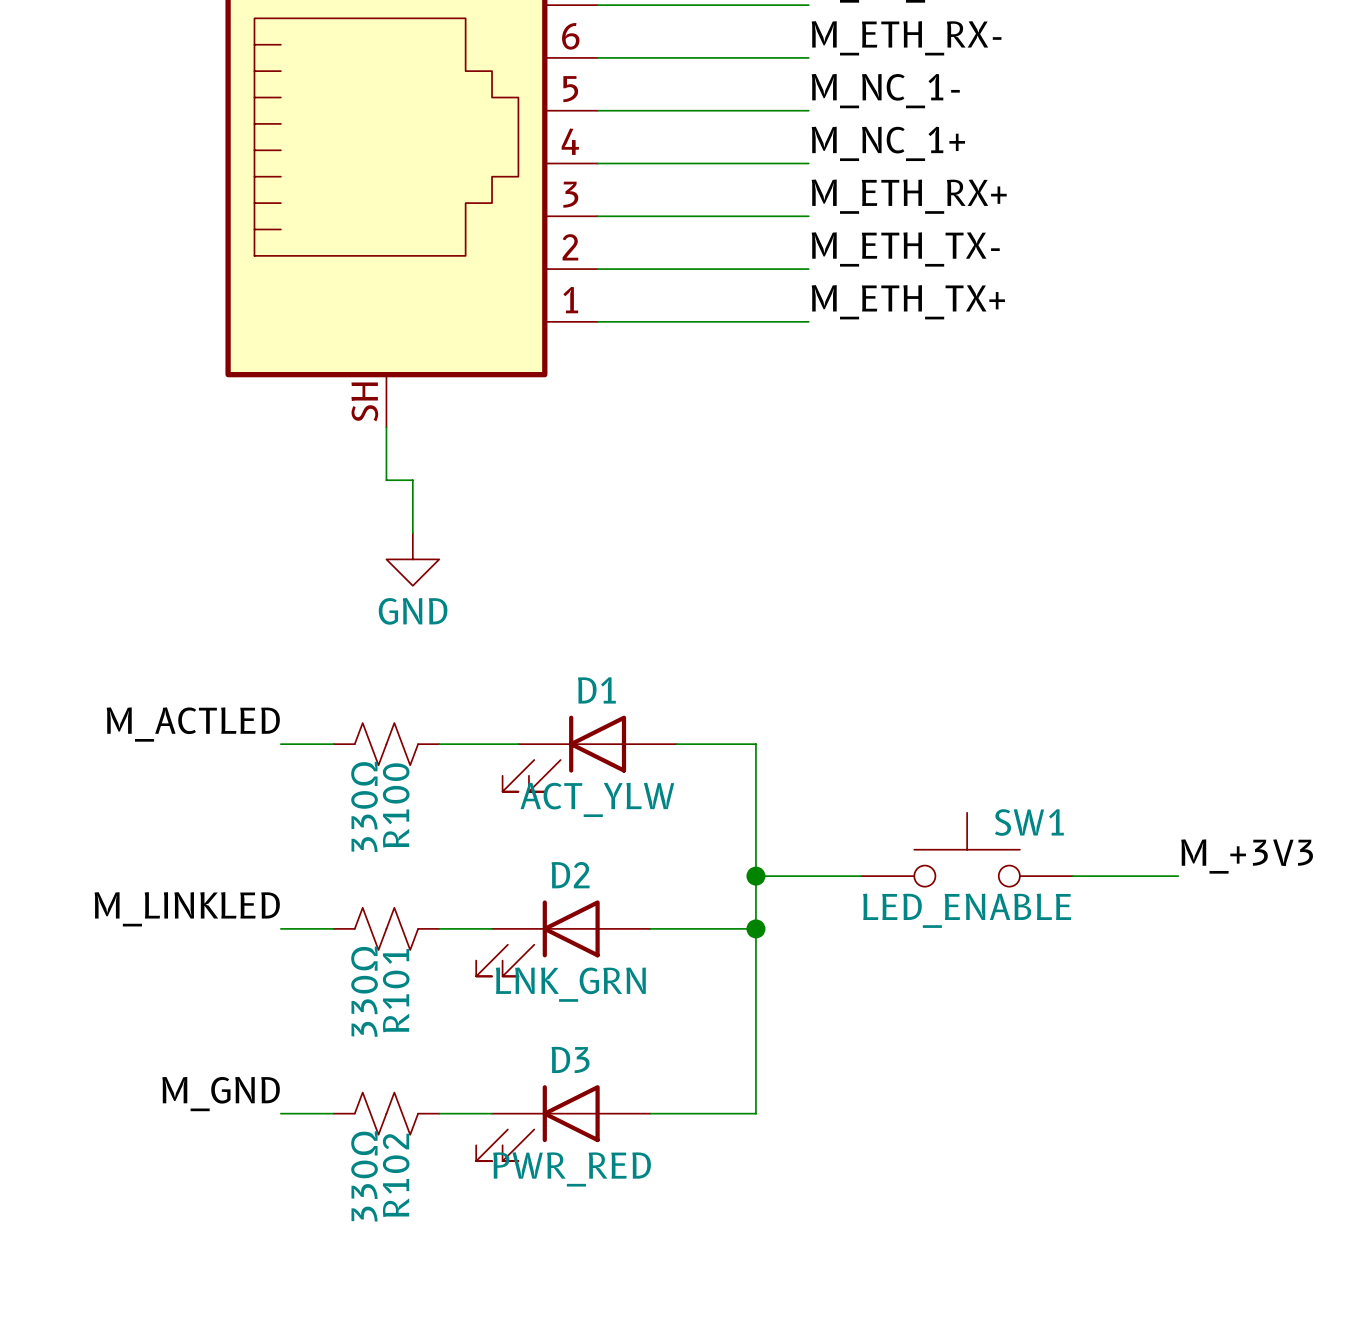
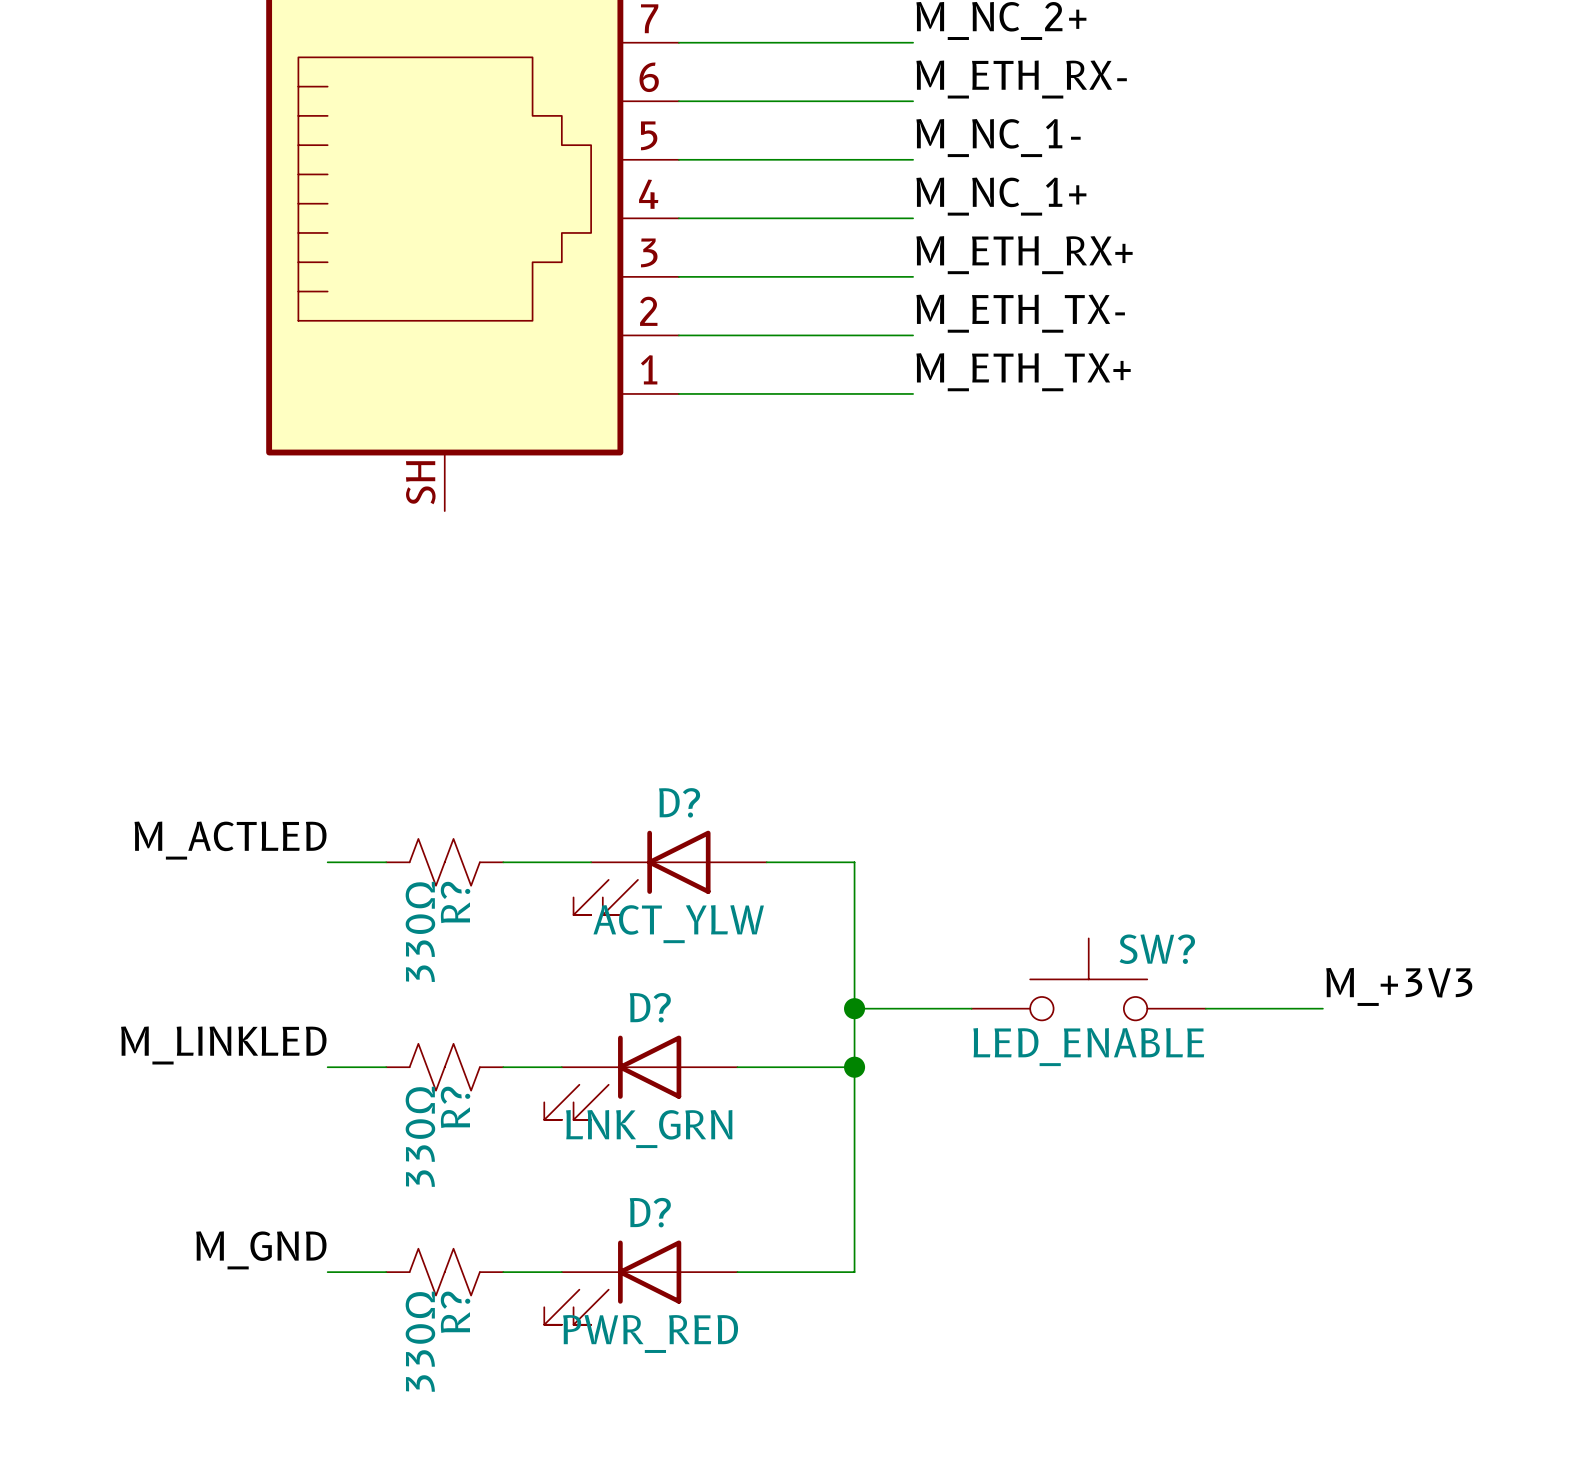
wire: (386, 427) (386, 480) (412, 480) (412, 533) -> none
power symbol: GND (412, 559) -> none
D1 name: D1 (596, 690) -> D? (679, 802)
R100 name: R100 (396, 805) -> R? (455, 902)
SW1 name: SW1 (1029, 822) -> SW? (1157, 949)
D2 name: D2 (570, 875) -> D? (650, 1007)
R101 name: R101 (396, 990) -> R? (455, 1107)
D3 name: D3 (570, 1059) -> D? (650, 1212)
R102 name: R102 (396, 1175) -> R? (455, 1312)

